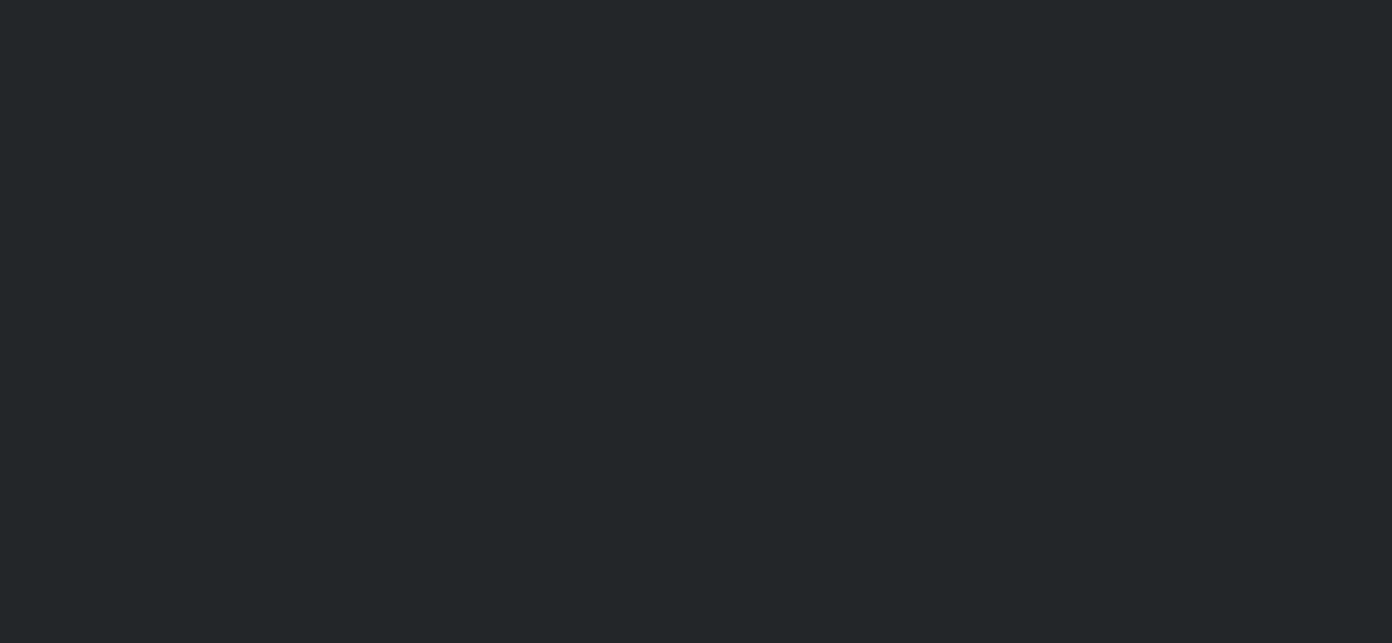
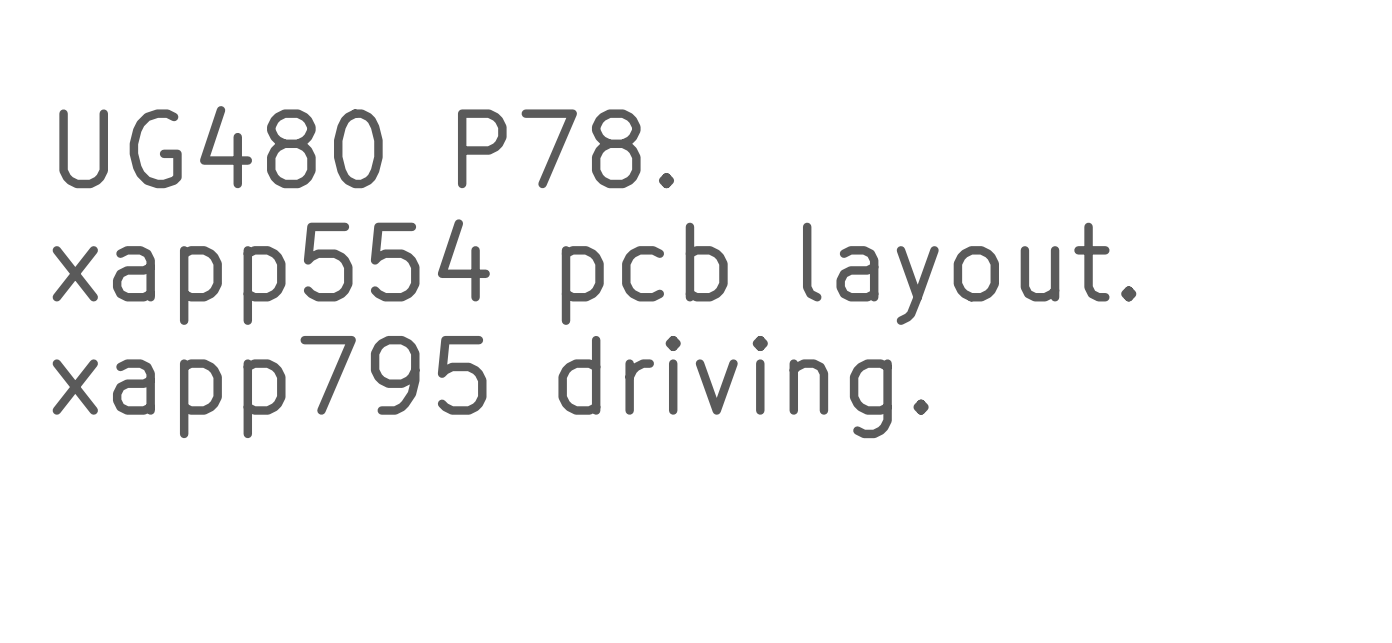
text: none -> UG480 P78. (366, 147)
text: none -> xapp554 pcb layout. (594, 272)
text: none -> xapp795 driving. (490, 387)

